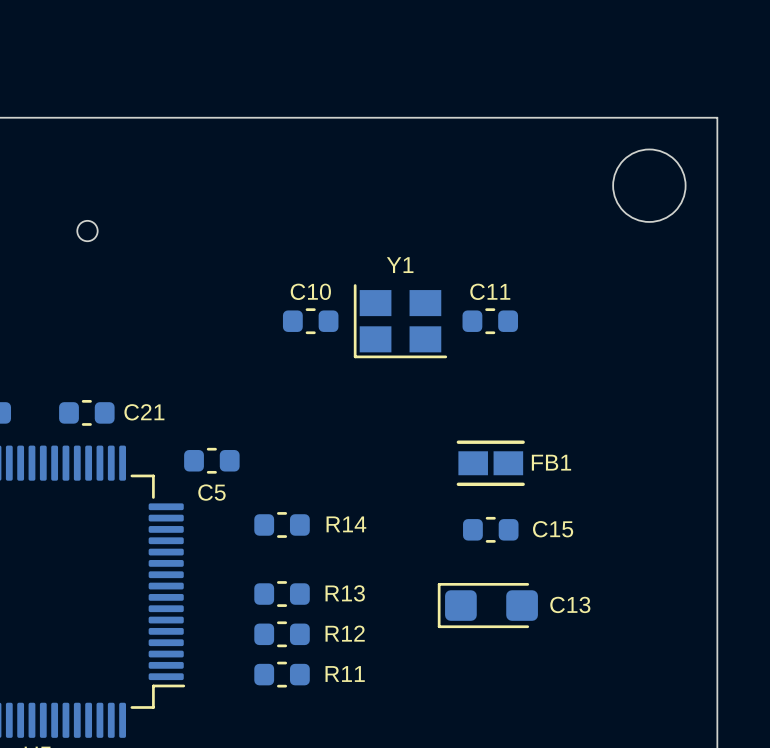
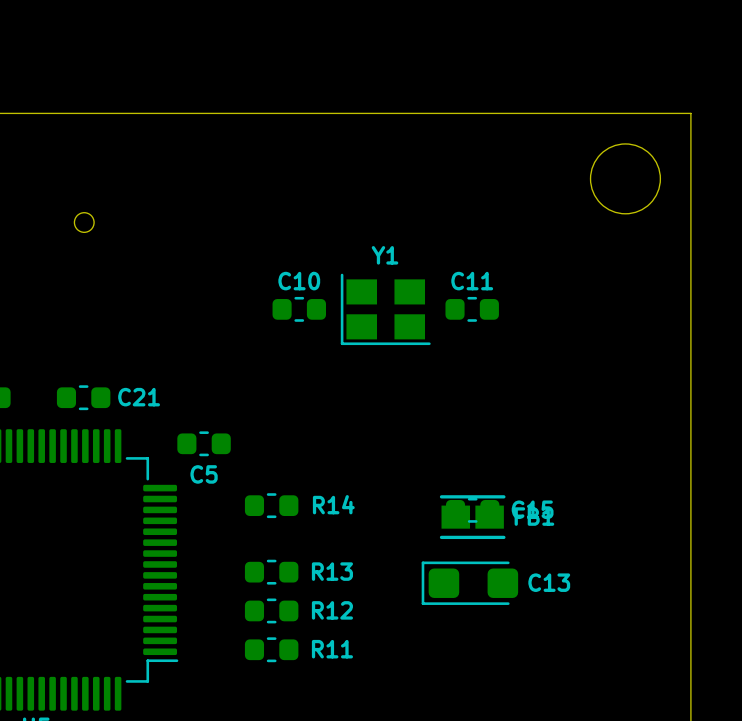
FB1 position: (490, 463) -> (472, 517)

